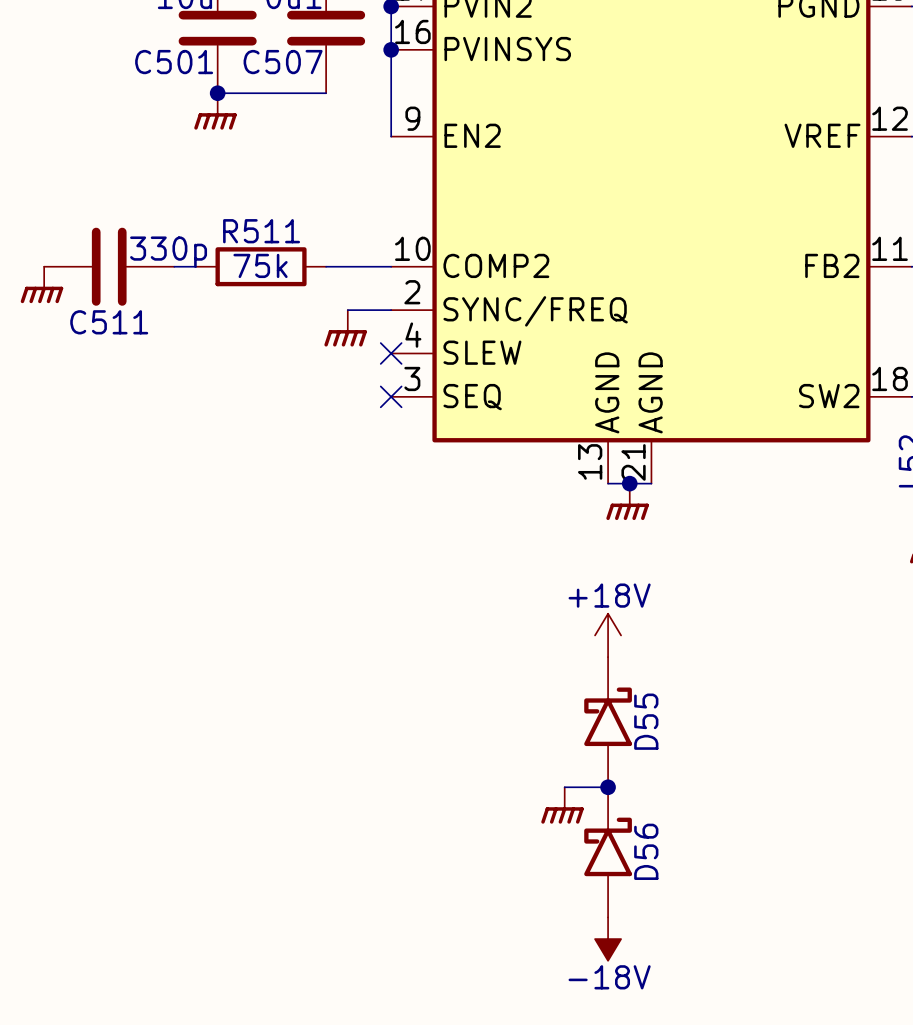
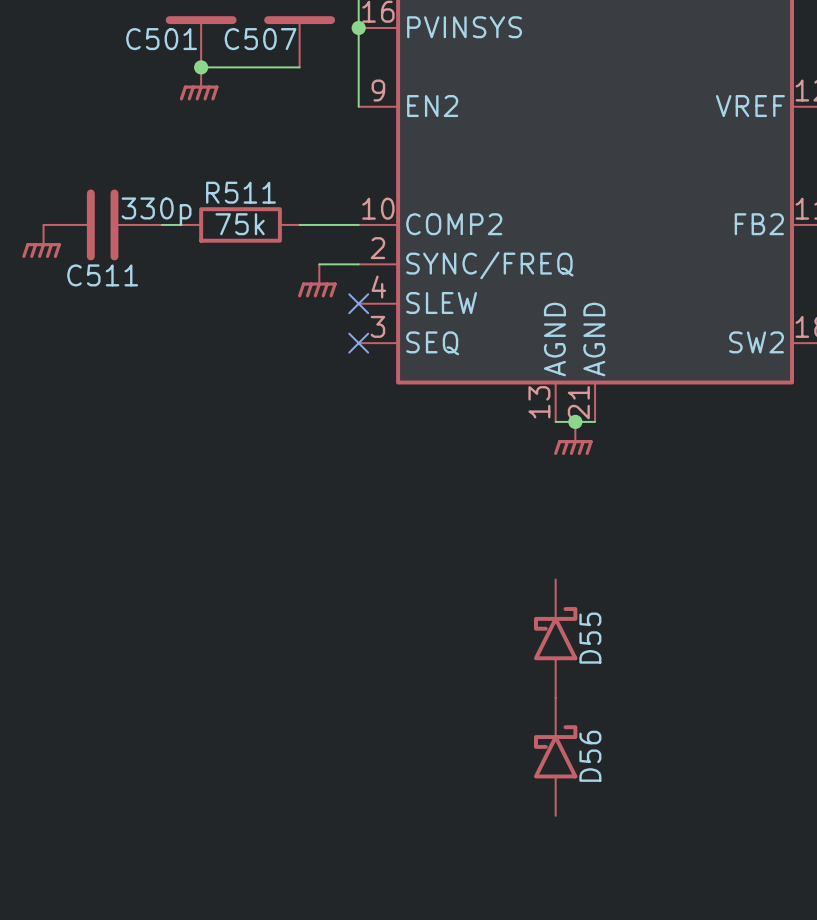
power symbol: +18V (608, 635) -> none
wire: (564, 787) (608, 787) -> none
junction: (608, 787) -> none
power symbol: (562, 805) -> none
power symbol: -18V (608, 939) -> none

